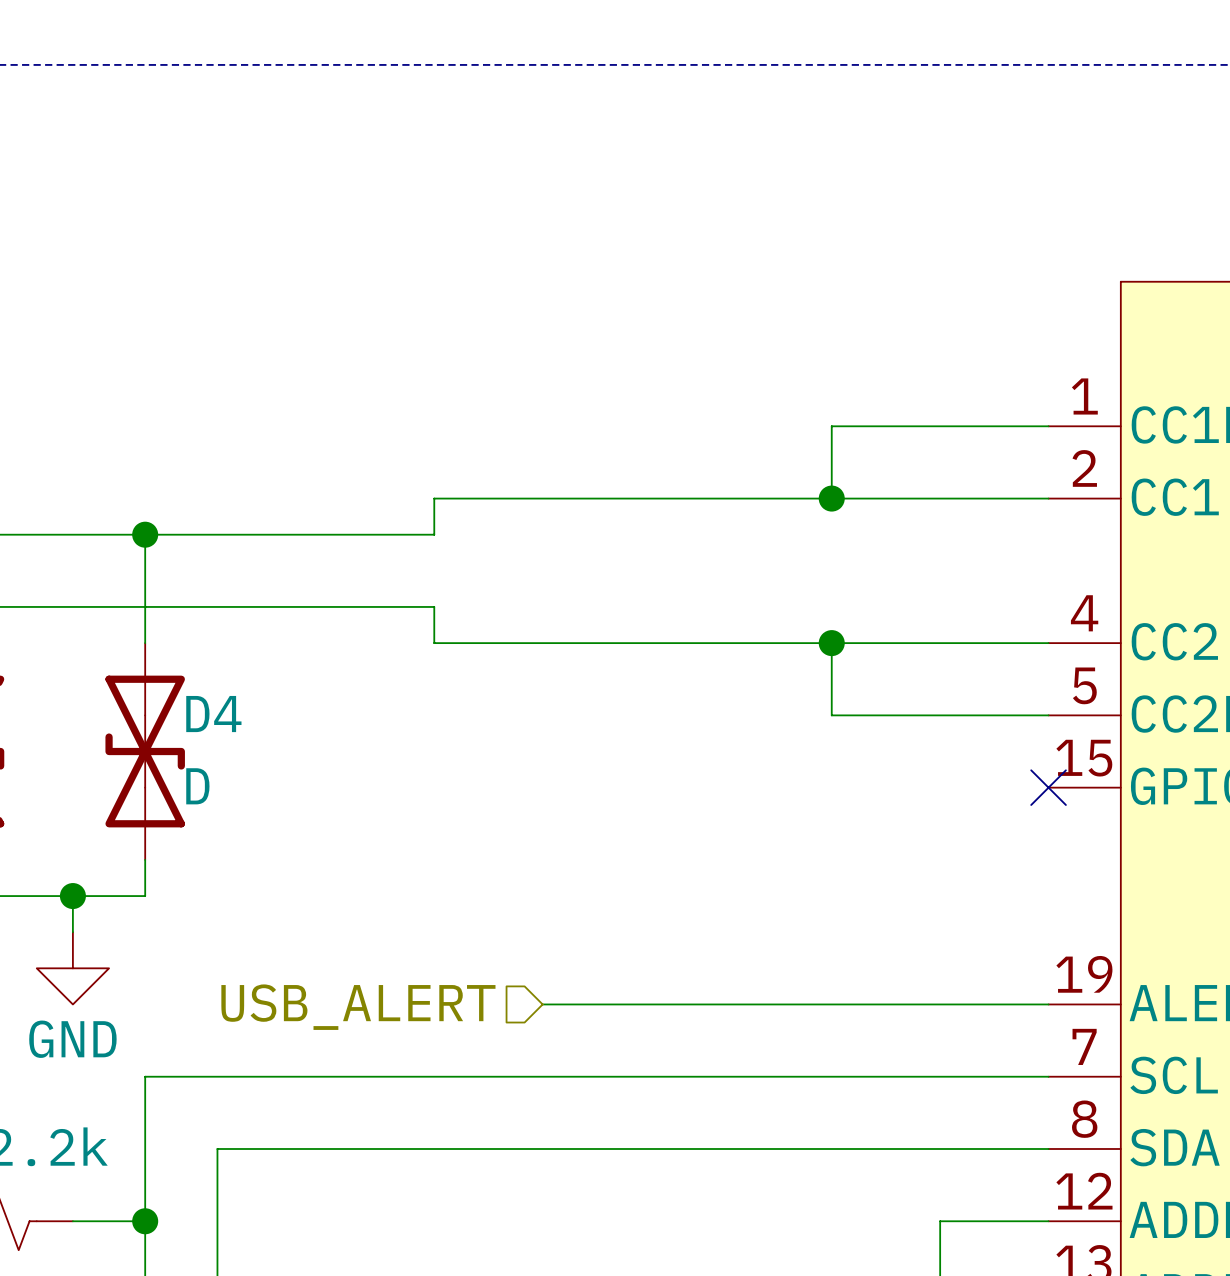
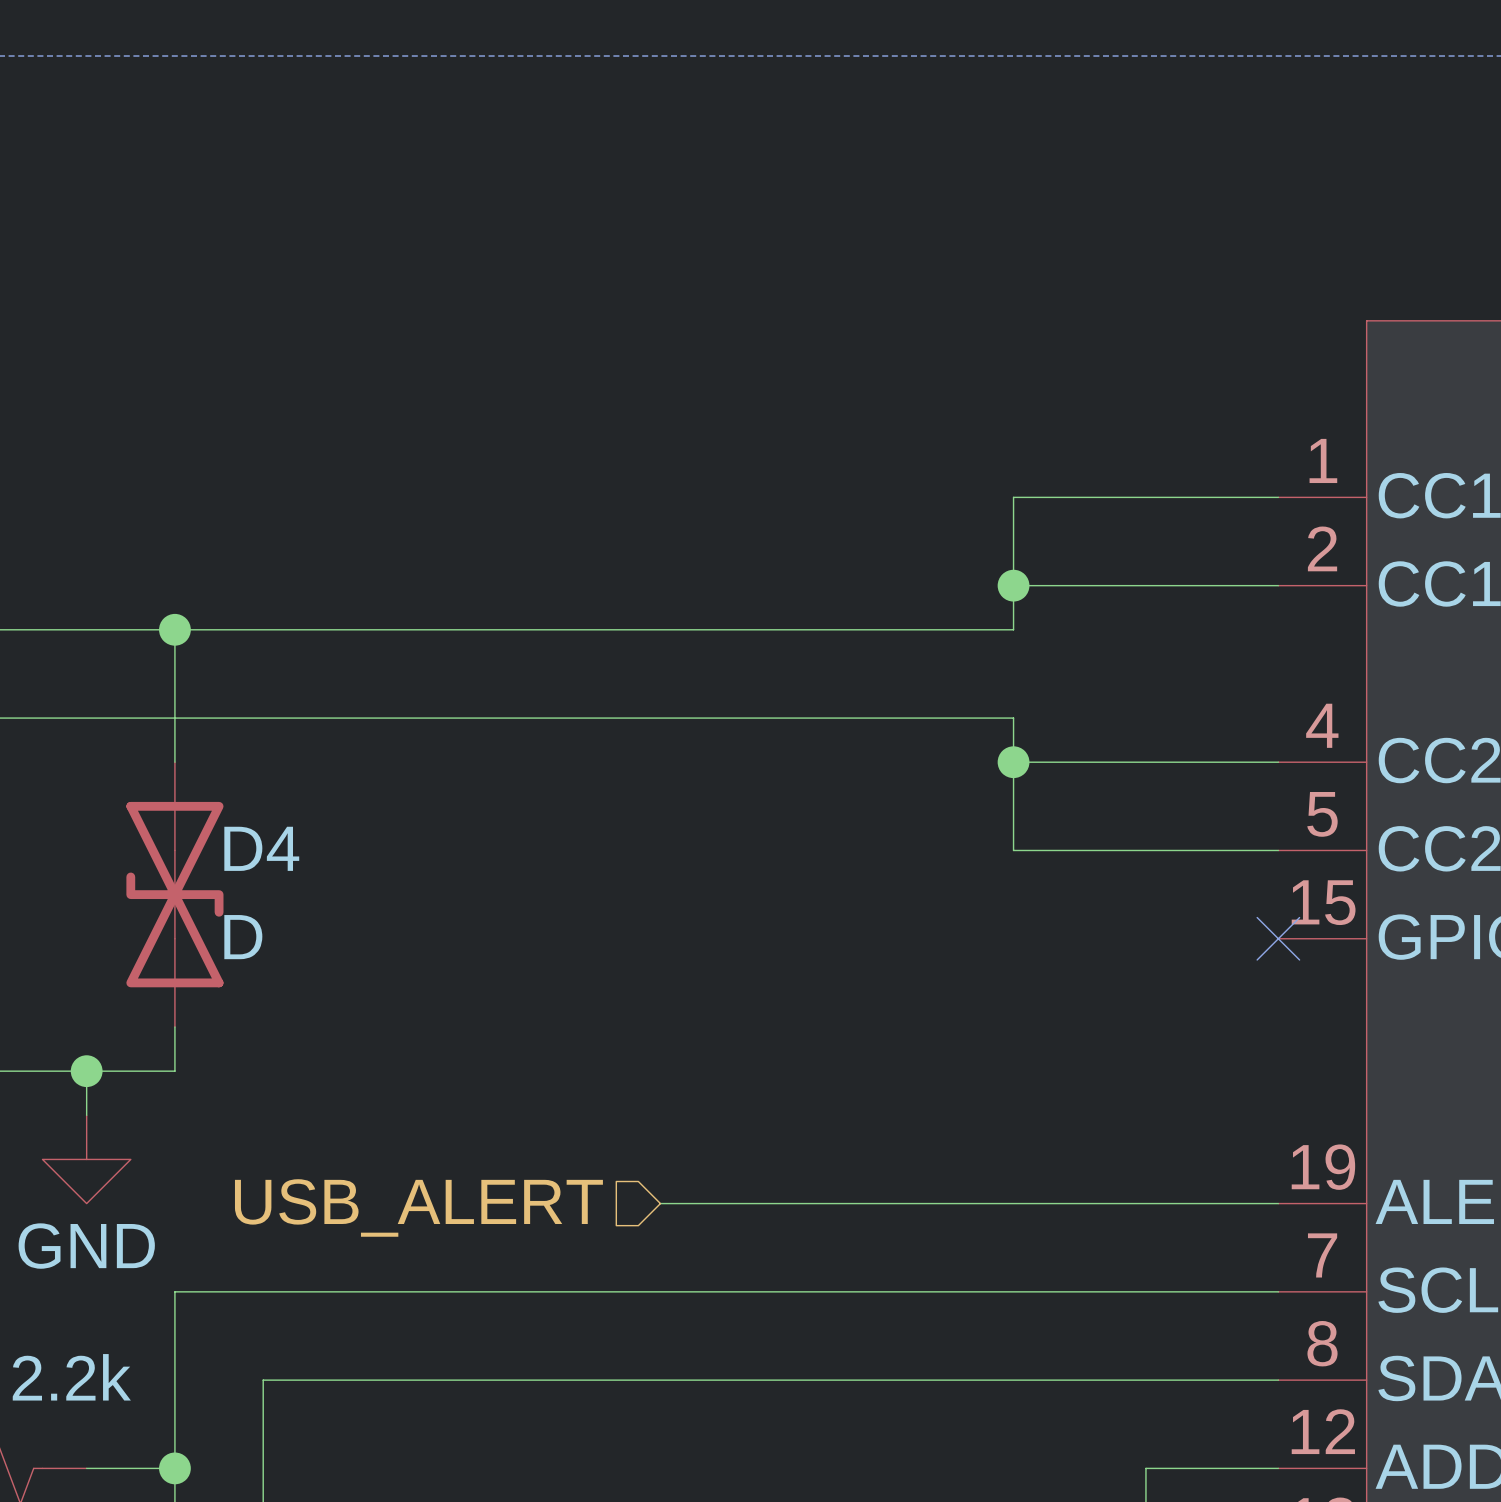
wire: (831, 498) (434, 498) (434, 534) -> (1013, 585) (1013, 629) (528, 629)
wire: (434, 606) (434, 643) (831, 643) -> (528, 718) (1013, 718) (1013, 762)

